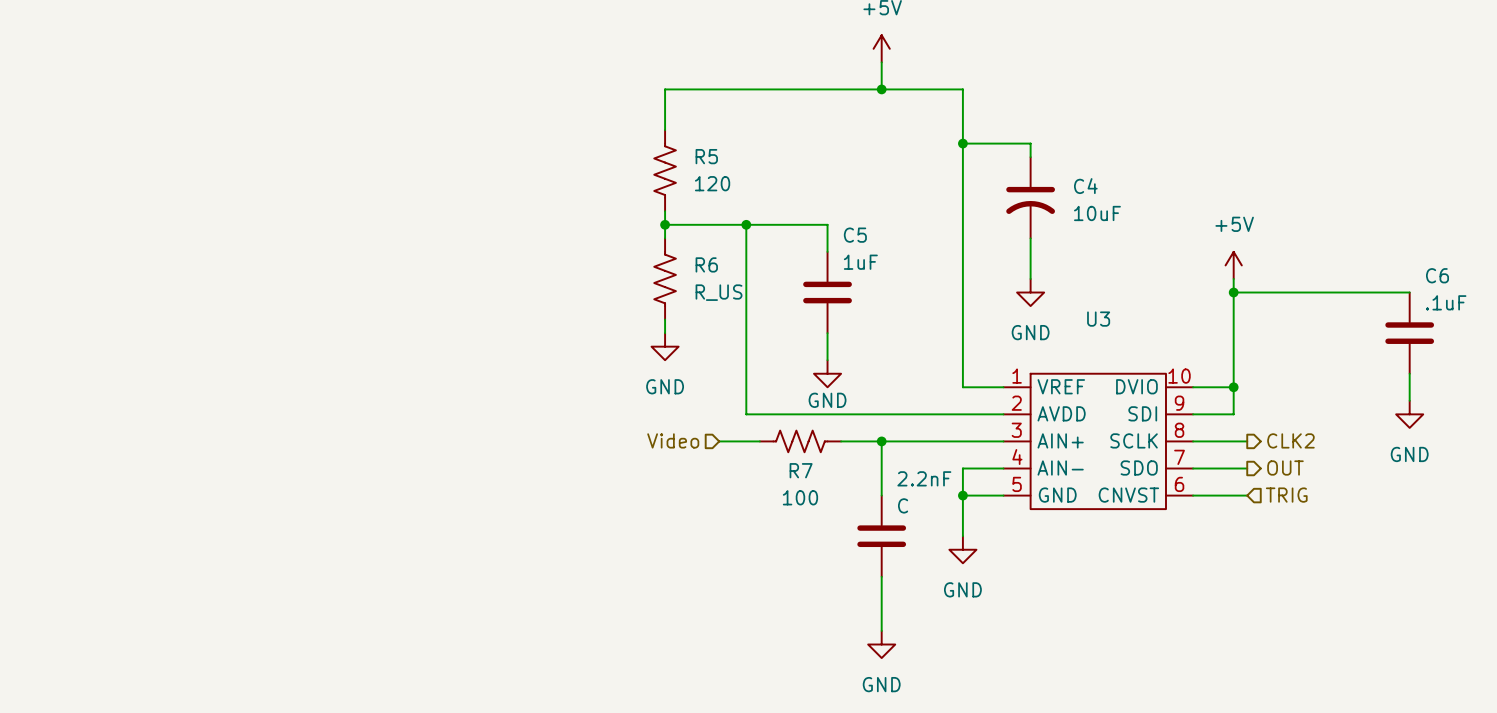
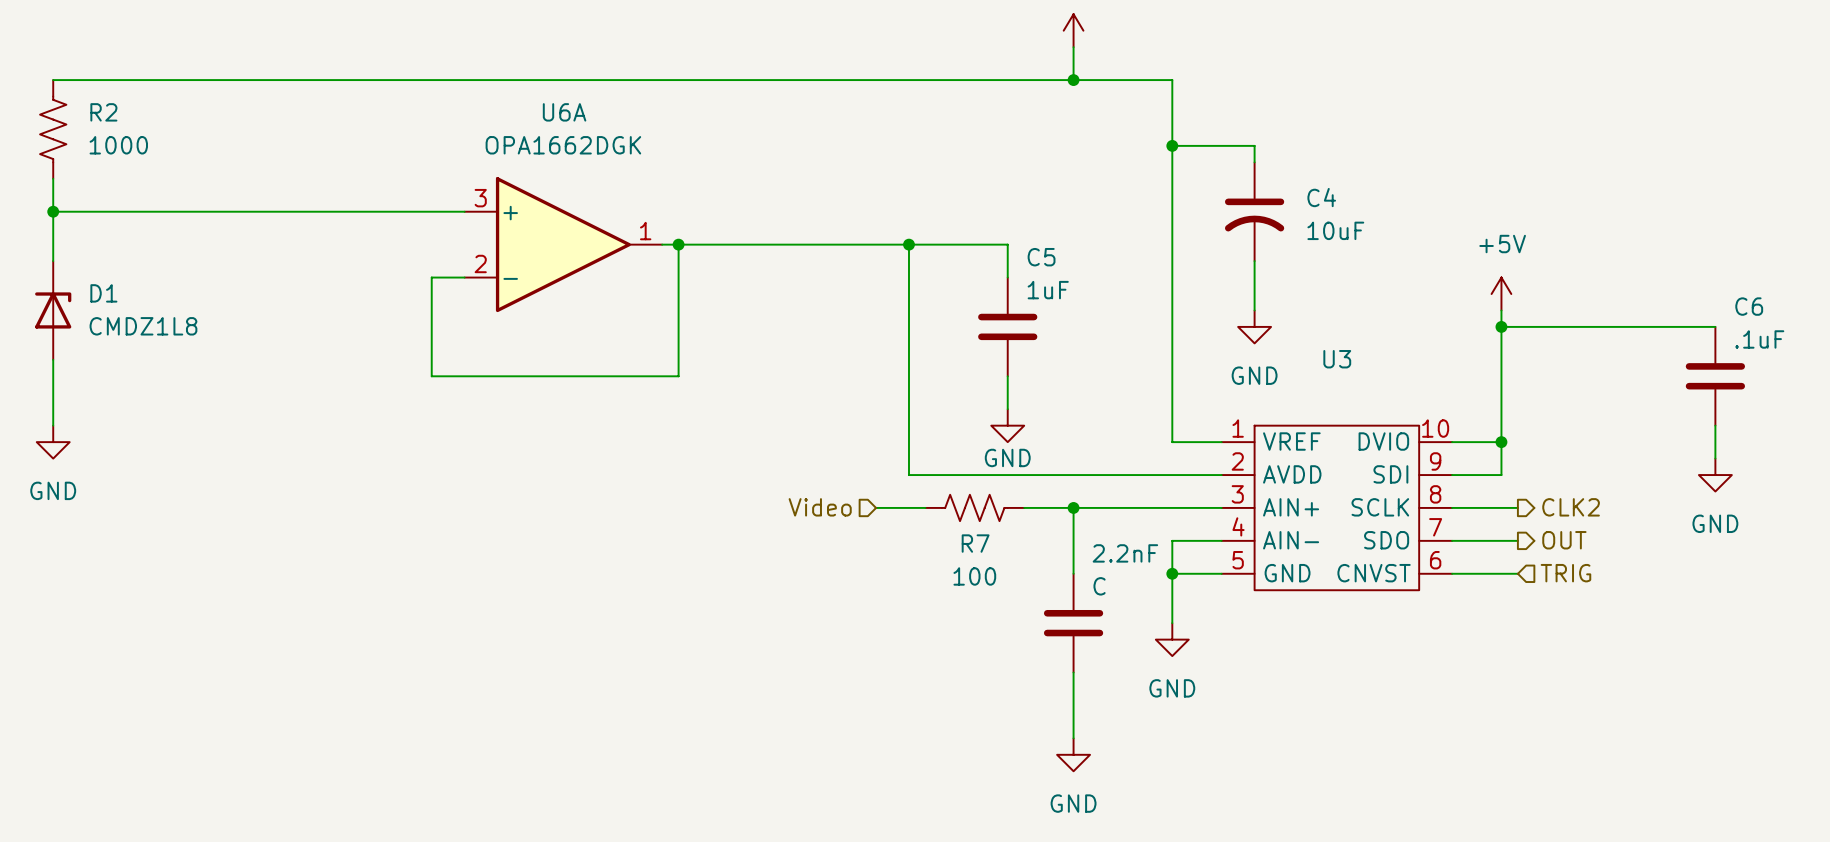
wire: (665, 89) (665, 130) -> (810, 80) (53, 80)
R2: none -> 1000 (53, 129)
wire: none -> (53, 178) (53, 261)
R5: 120 (665, 170) -> none
wire: none -> (53, 211) (464, 211)
junction: none -> (53, 211)
wire: (665, 211) (665, 238) -> none
U6A: none -> OPA1662DGK (563, 244)
wire: none -> (662, 244) (810, 244)
wire: none -> (678, 244) (678, 376) (431, 376) (431, 277) (464, 277)
junction: none -> (678, 244)
junction: (665, 224) -> none
D1: none -> CMDZ1L8 (53, 310)
R6: R_US (665, 278) -> none
wire: none -> (53, 359) (53, 425)
wire: (665, 319) (665, 333) -> none
power symbol: GND (665, 346) -> none
power symbol: none -> GND (53, 442)

